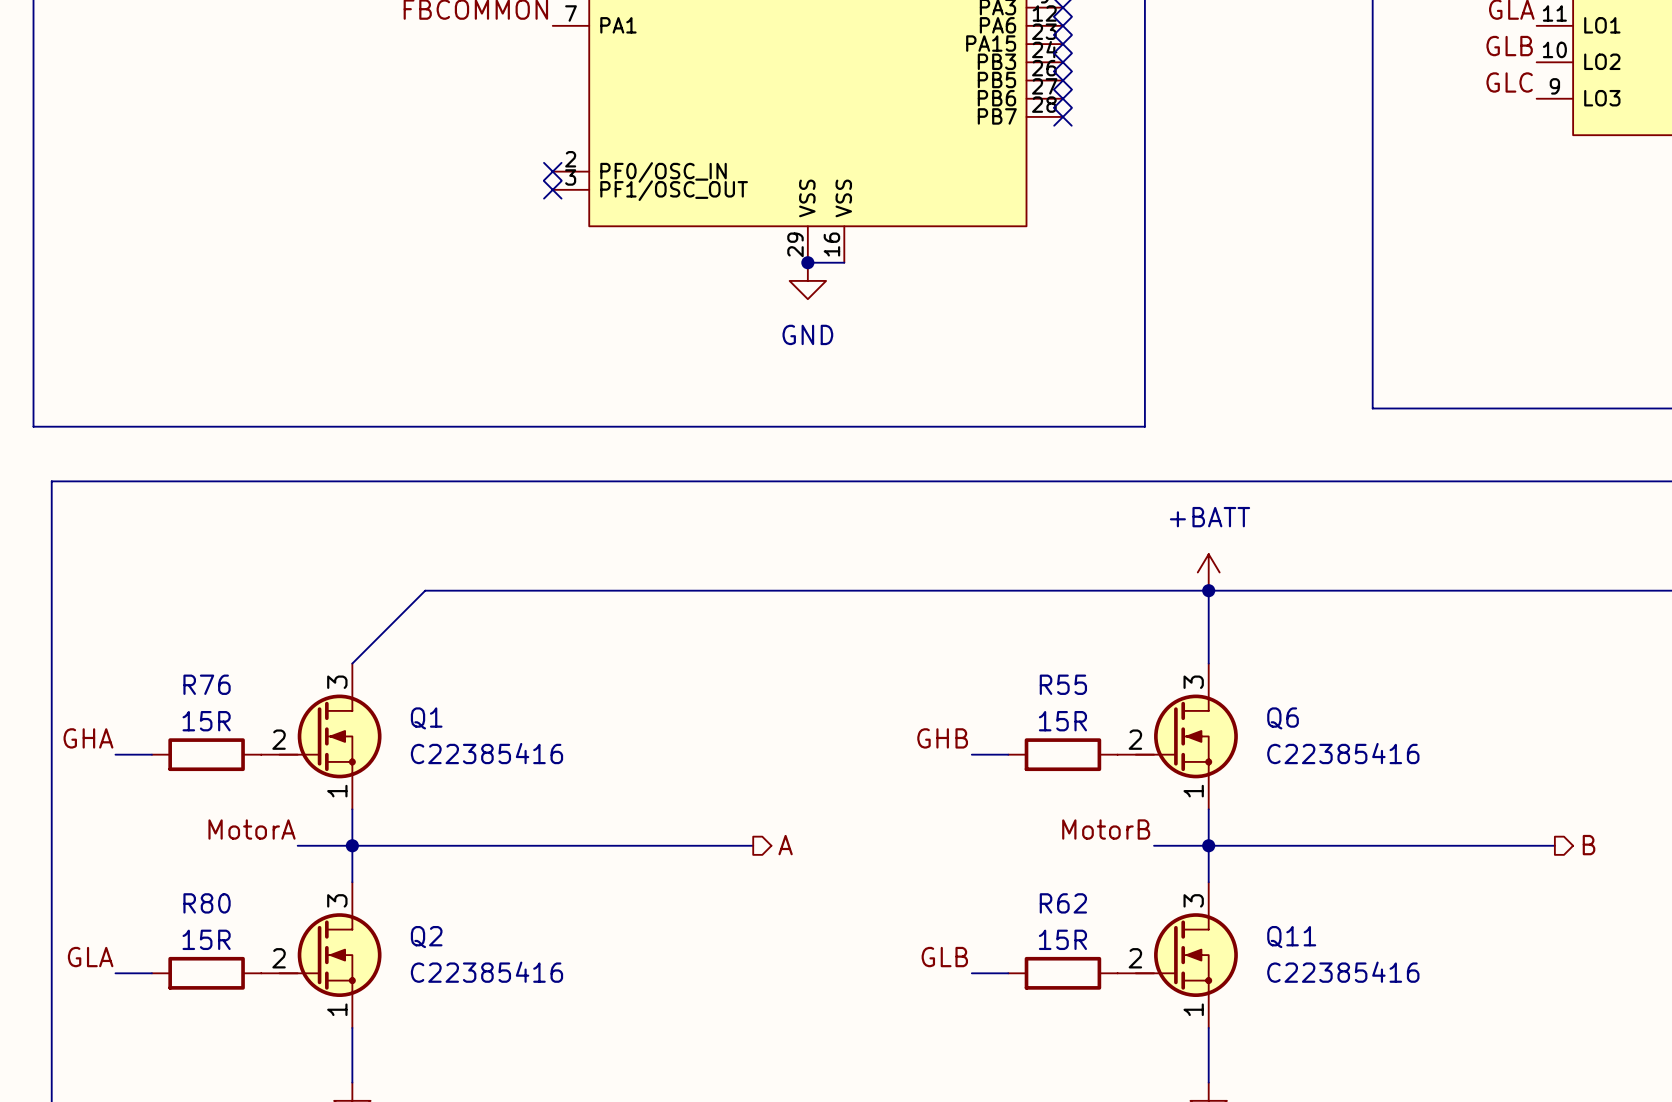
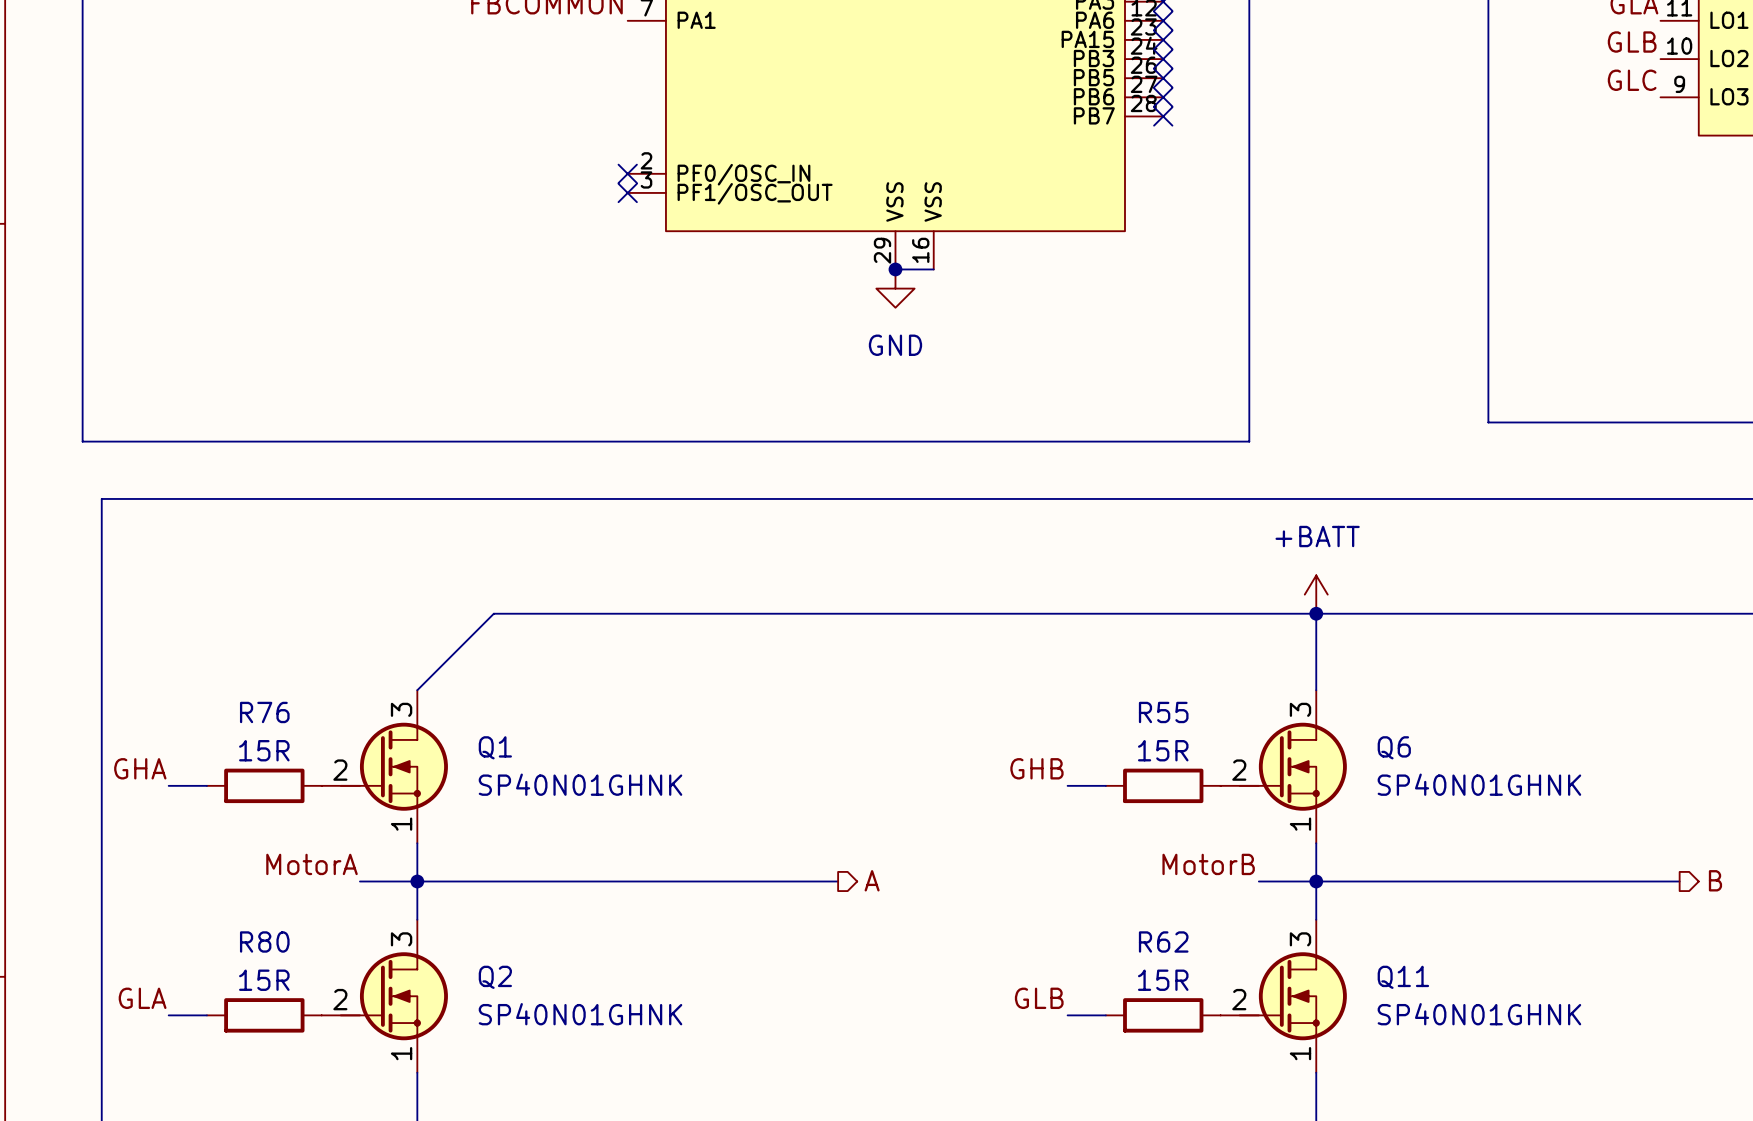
Q1 value: C22385416 (486, 753) -> SP40N01GHNK (580, 784)
Q6 value: C22385416 (1343, 753) -> SP40N01GHNK (1479, 784)
Q2 value: C22385416 (486, 972) -> SP40N01GHNK (580, 1014)
Q11 value: C22385416 (1343, 972) -> SP40N01GHNK (1479, 1014)

